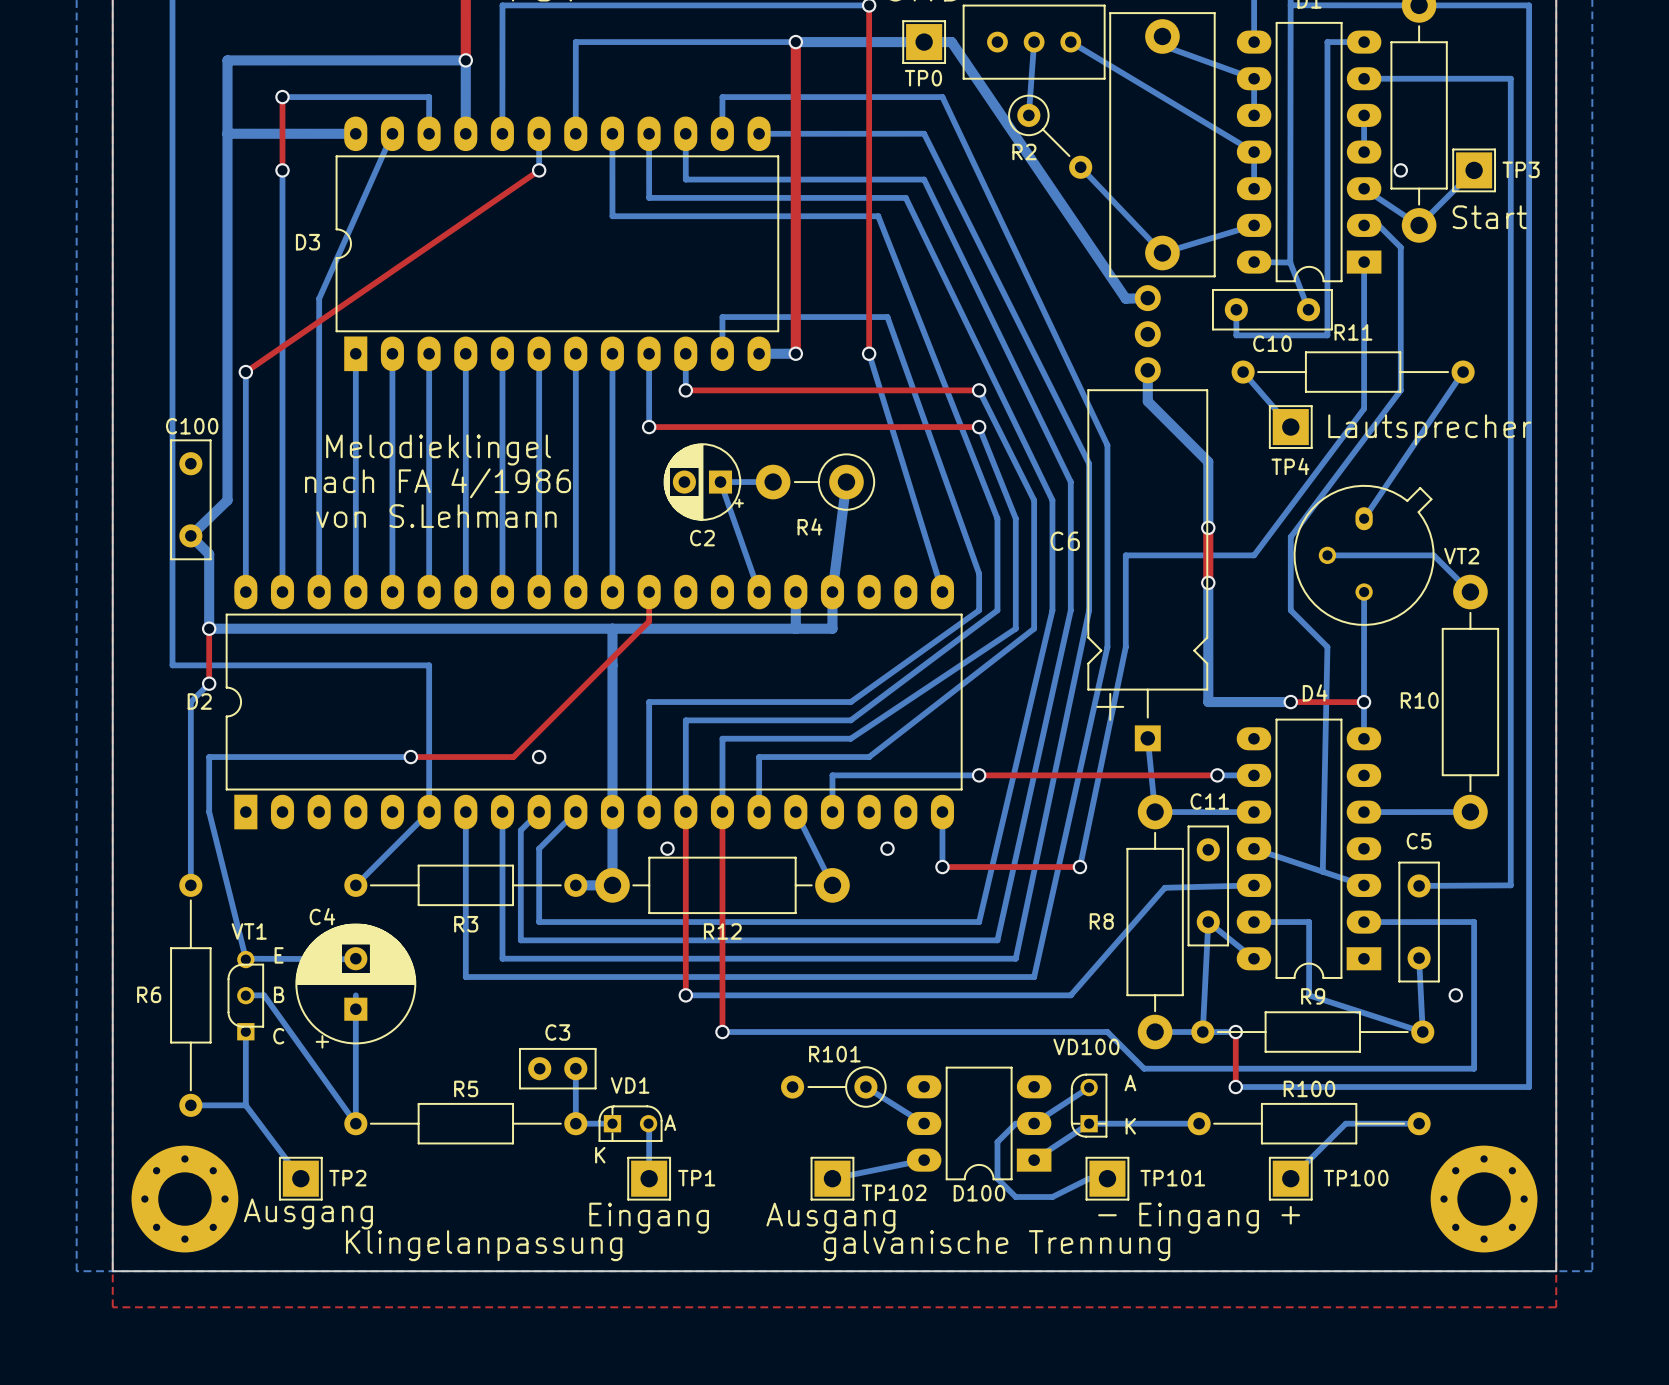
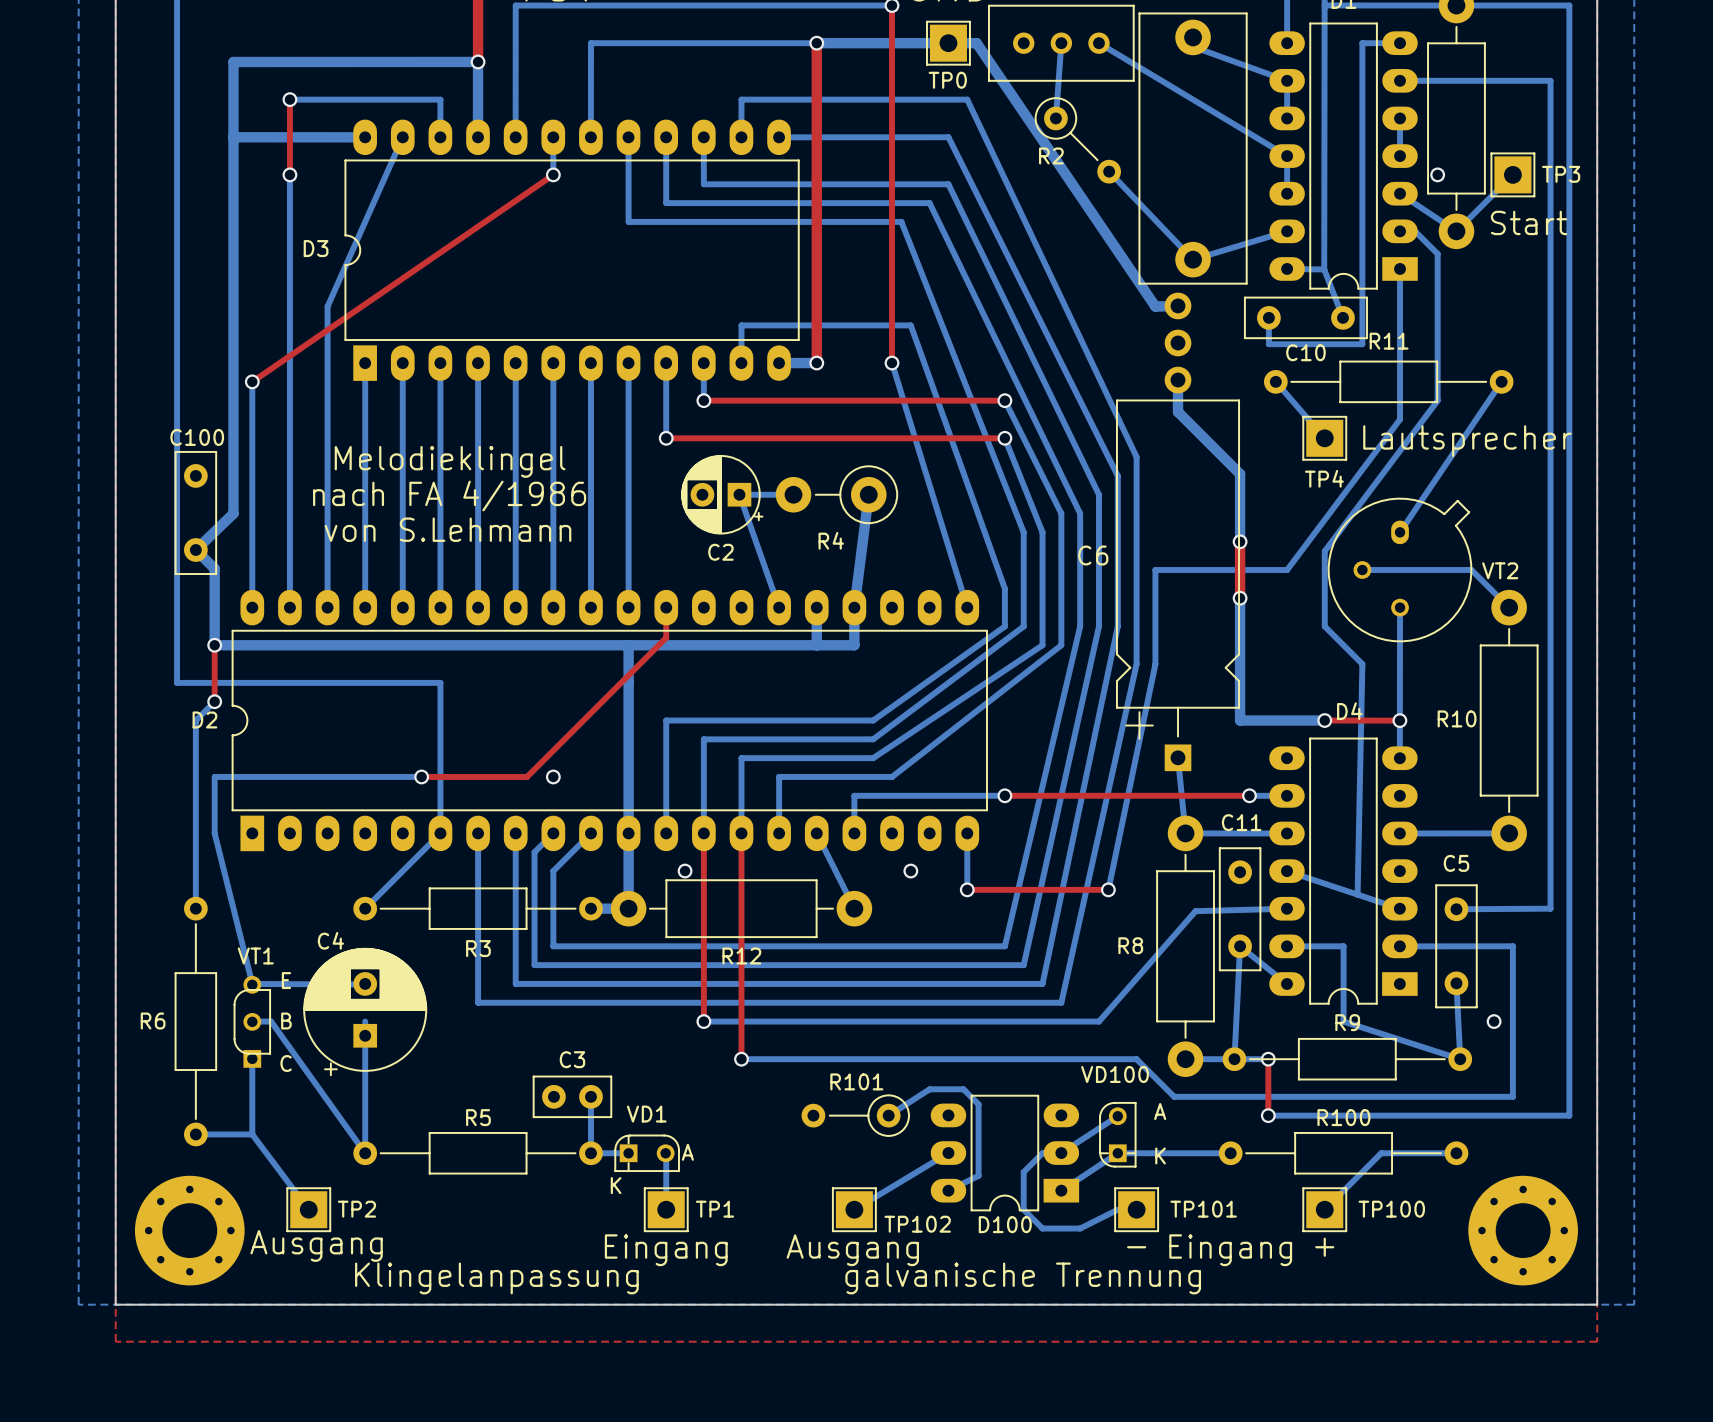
bottom track: (865, 1087) (923, 1123) -> (888, 1115) (929, 1089) (963, 1089) (978, 1104) (978, 1175) (948, 1190)
bottom track: (924, 1160) (832, 1178) -> (948, 1153) (854, 1209)

